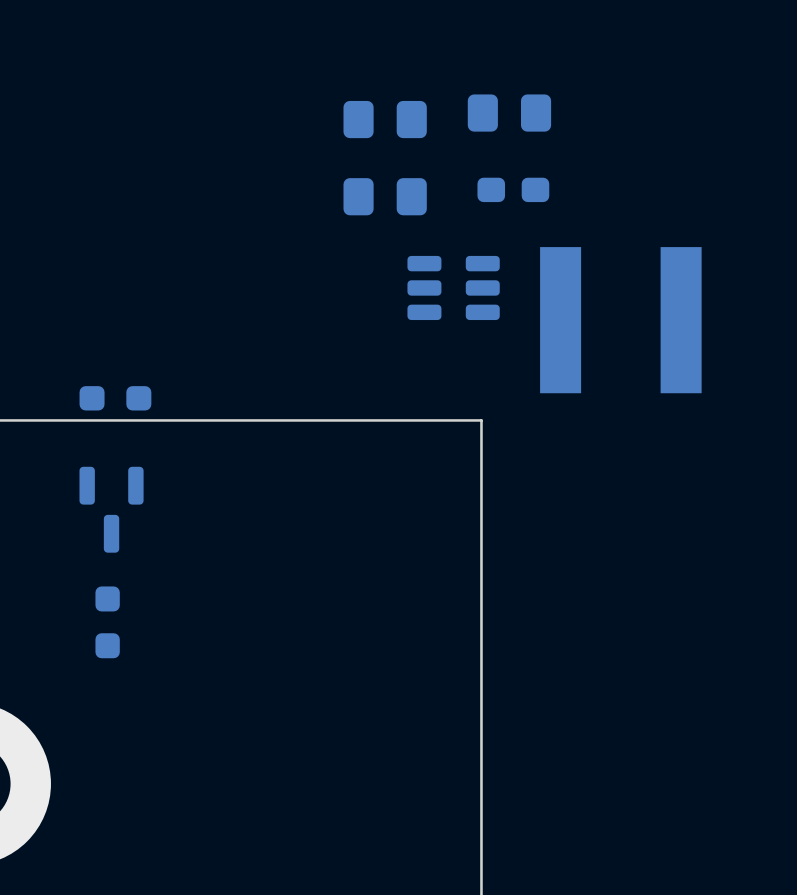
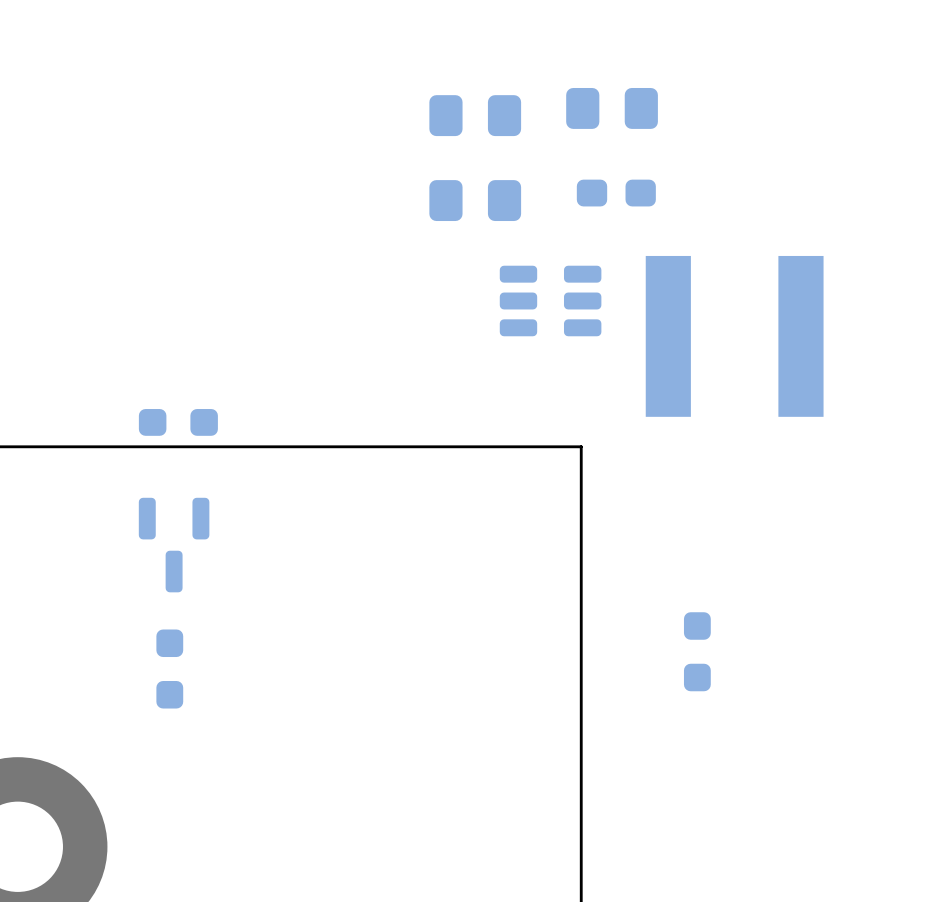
part: none -> (697, 651)

